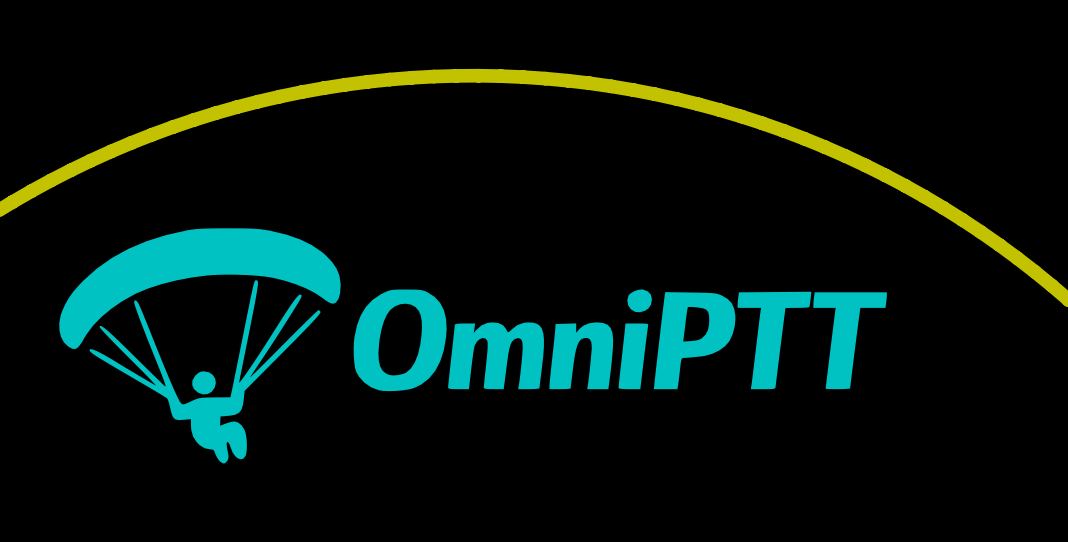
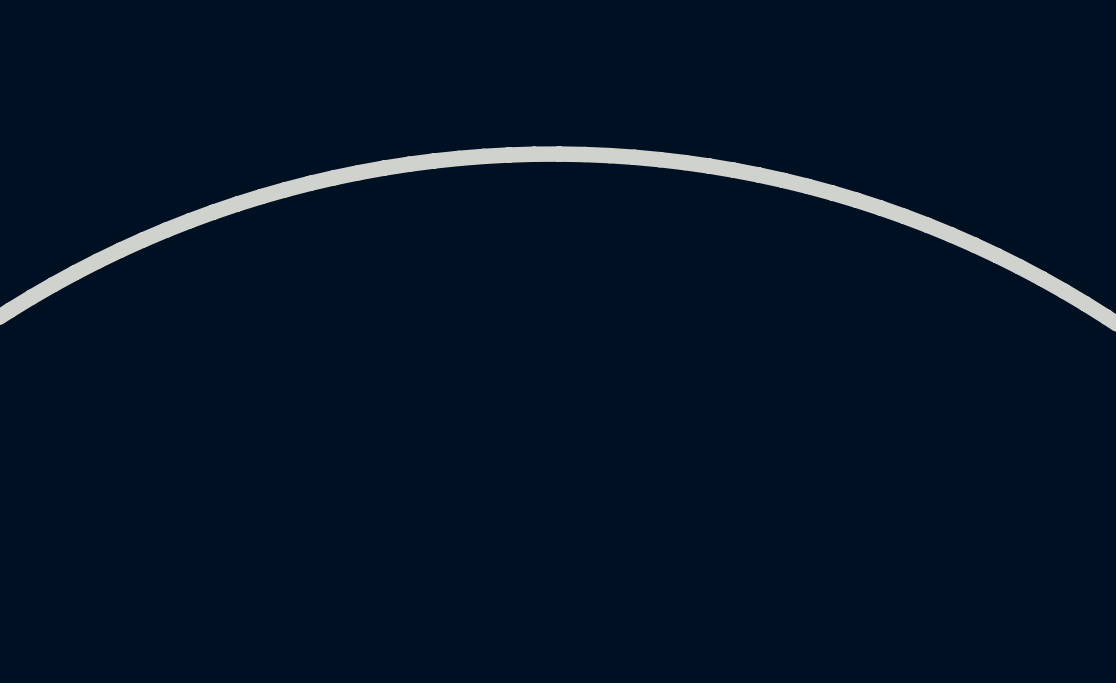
drawing: [59, 228, 887, 464] -> none

